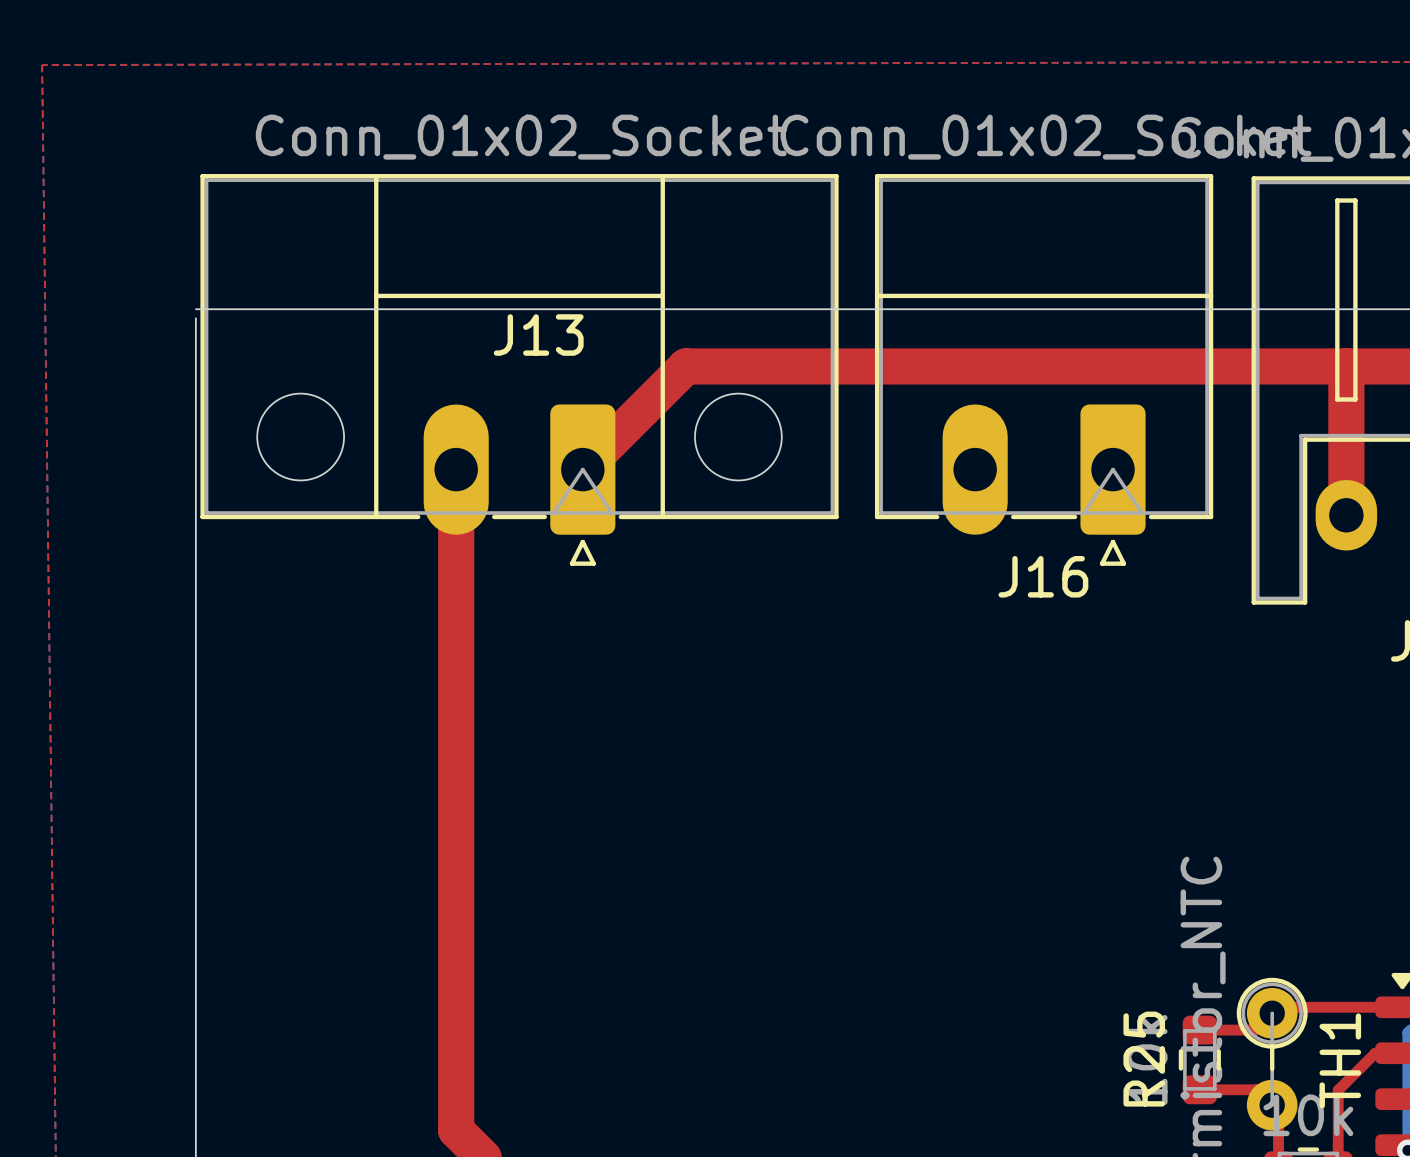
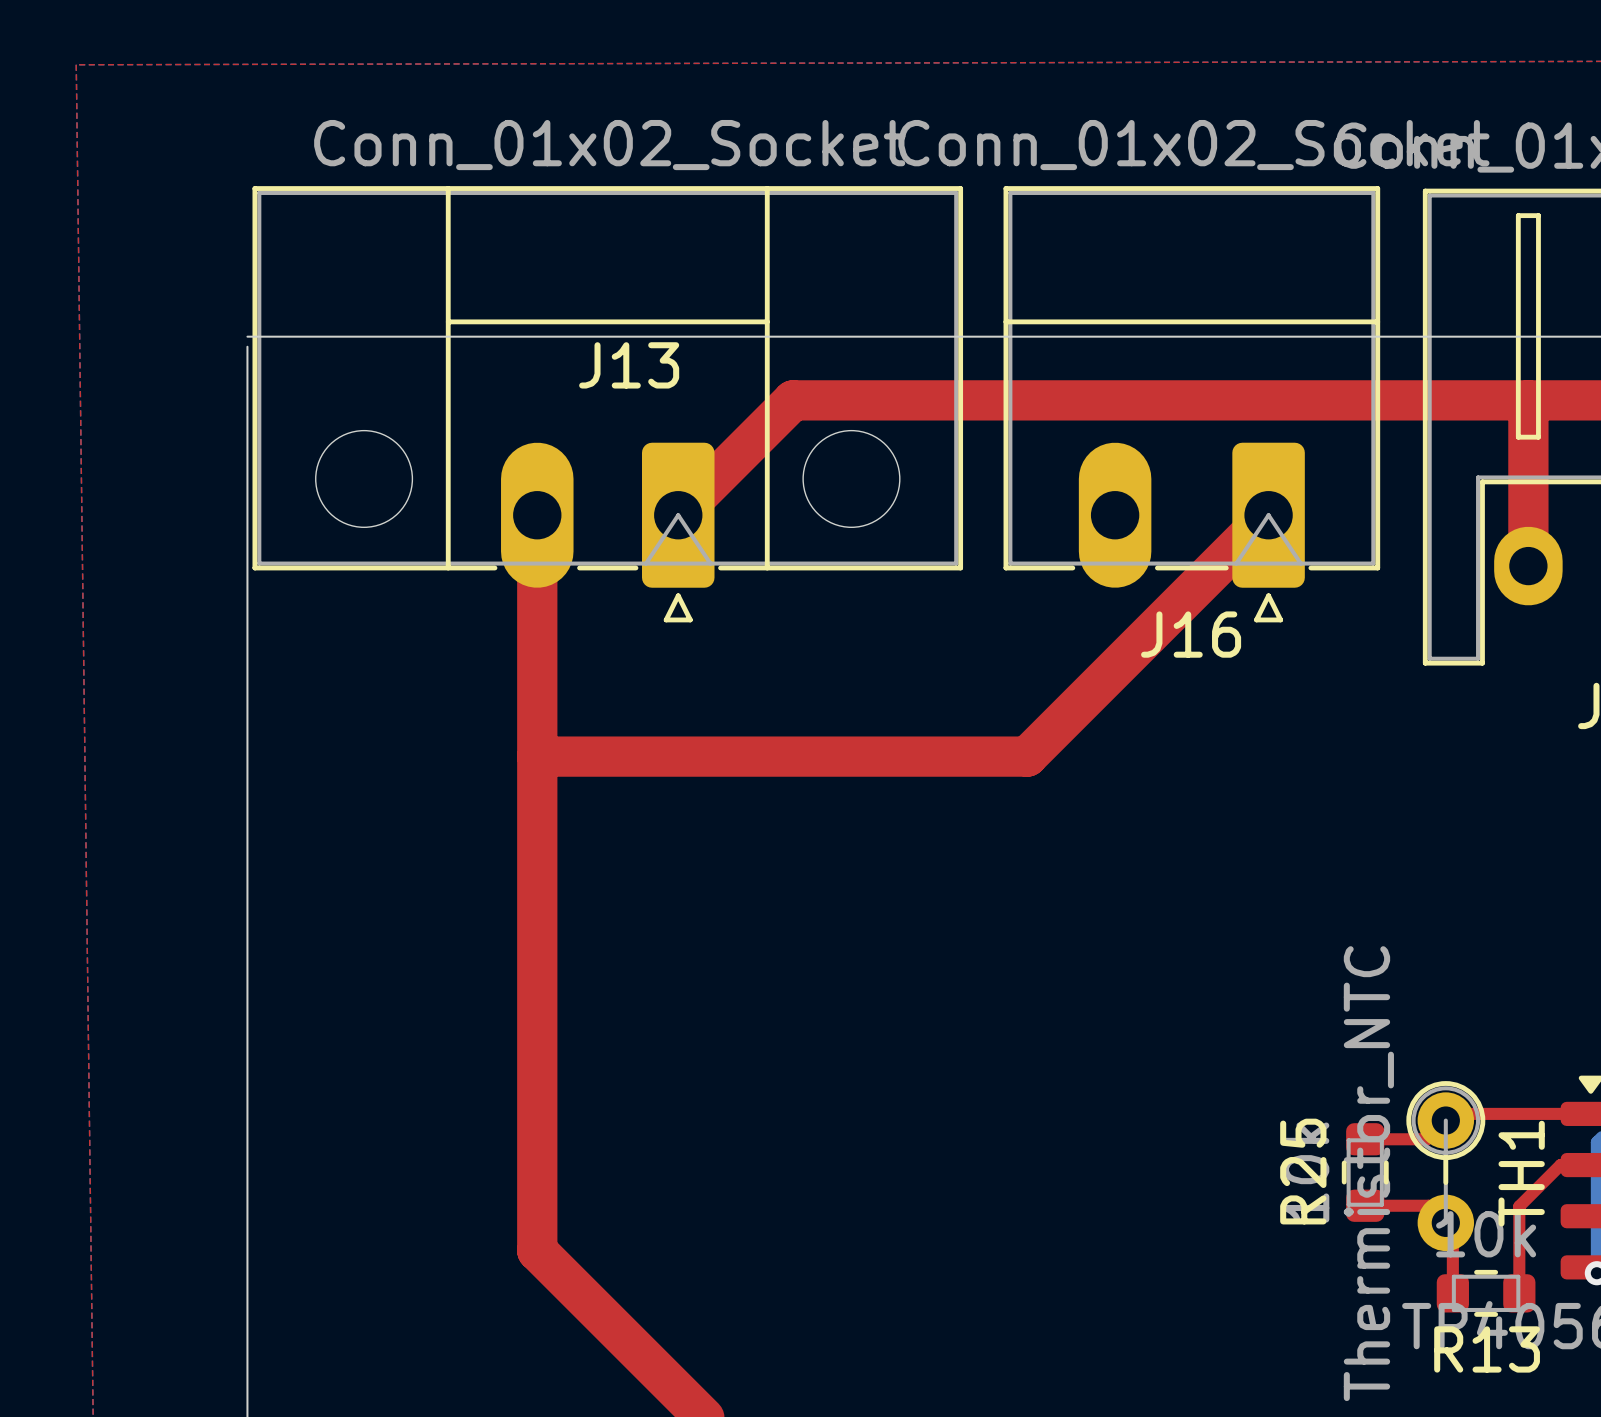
top track: none -> (1268, 515) (1027, 756) (537, 756)

